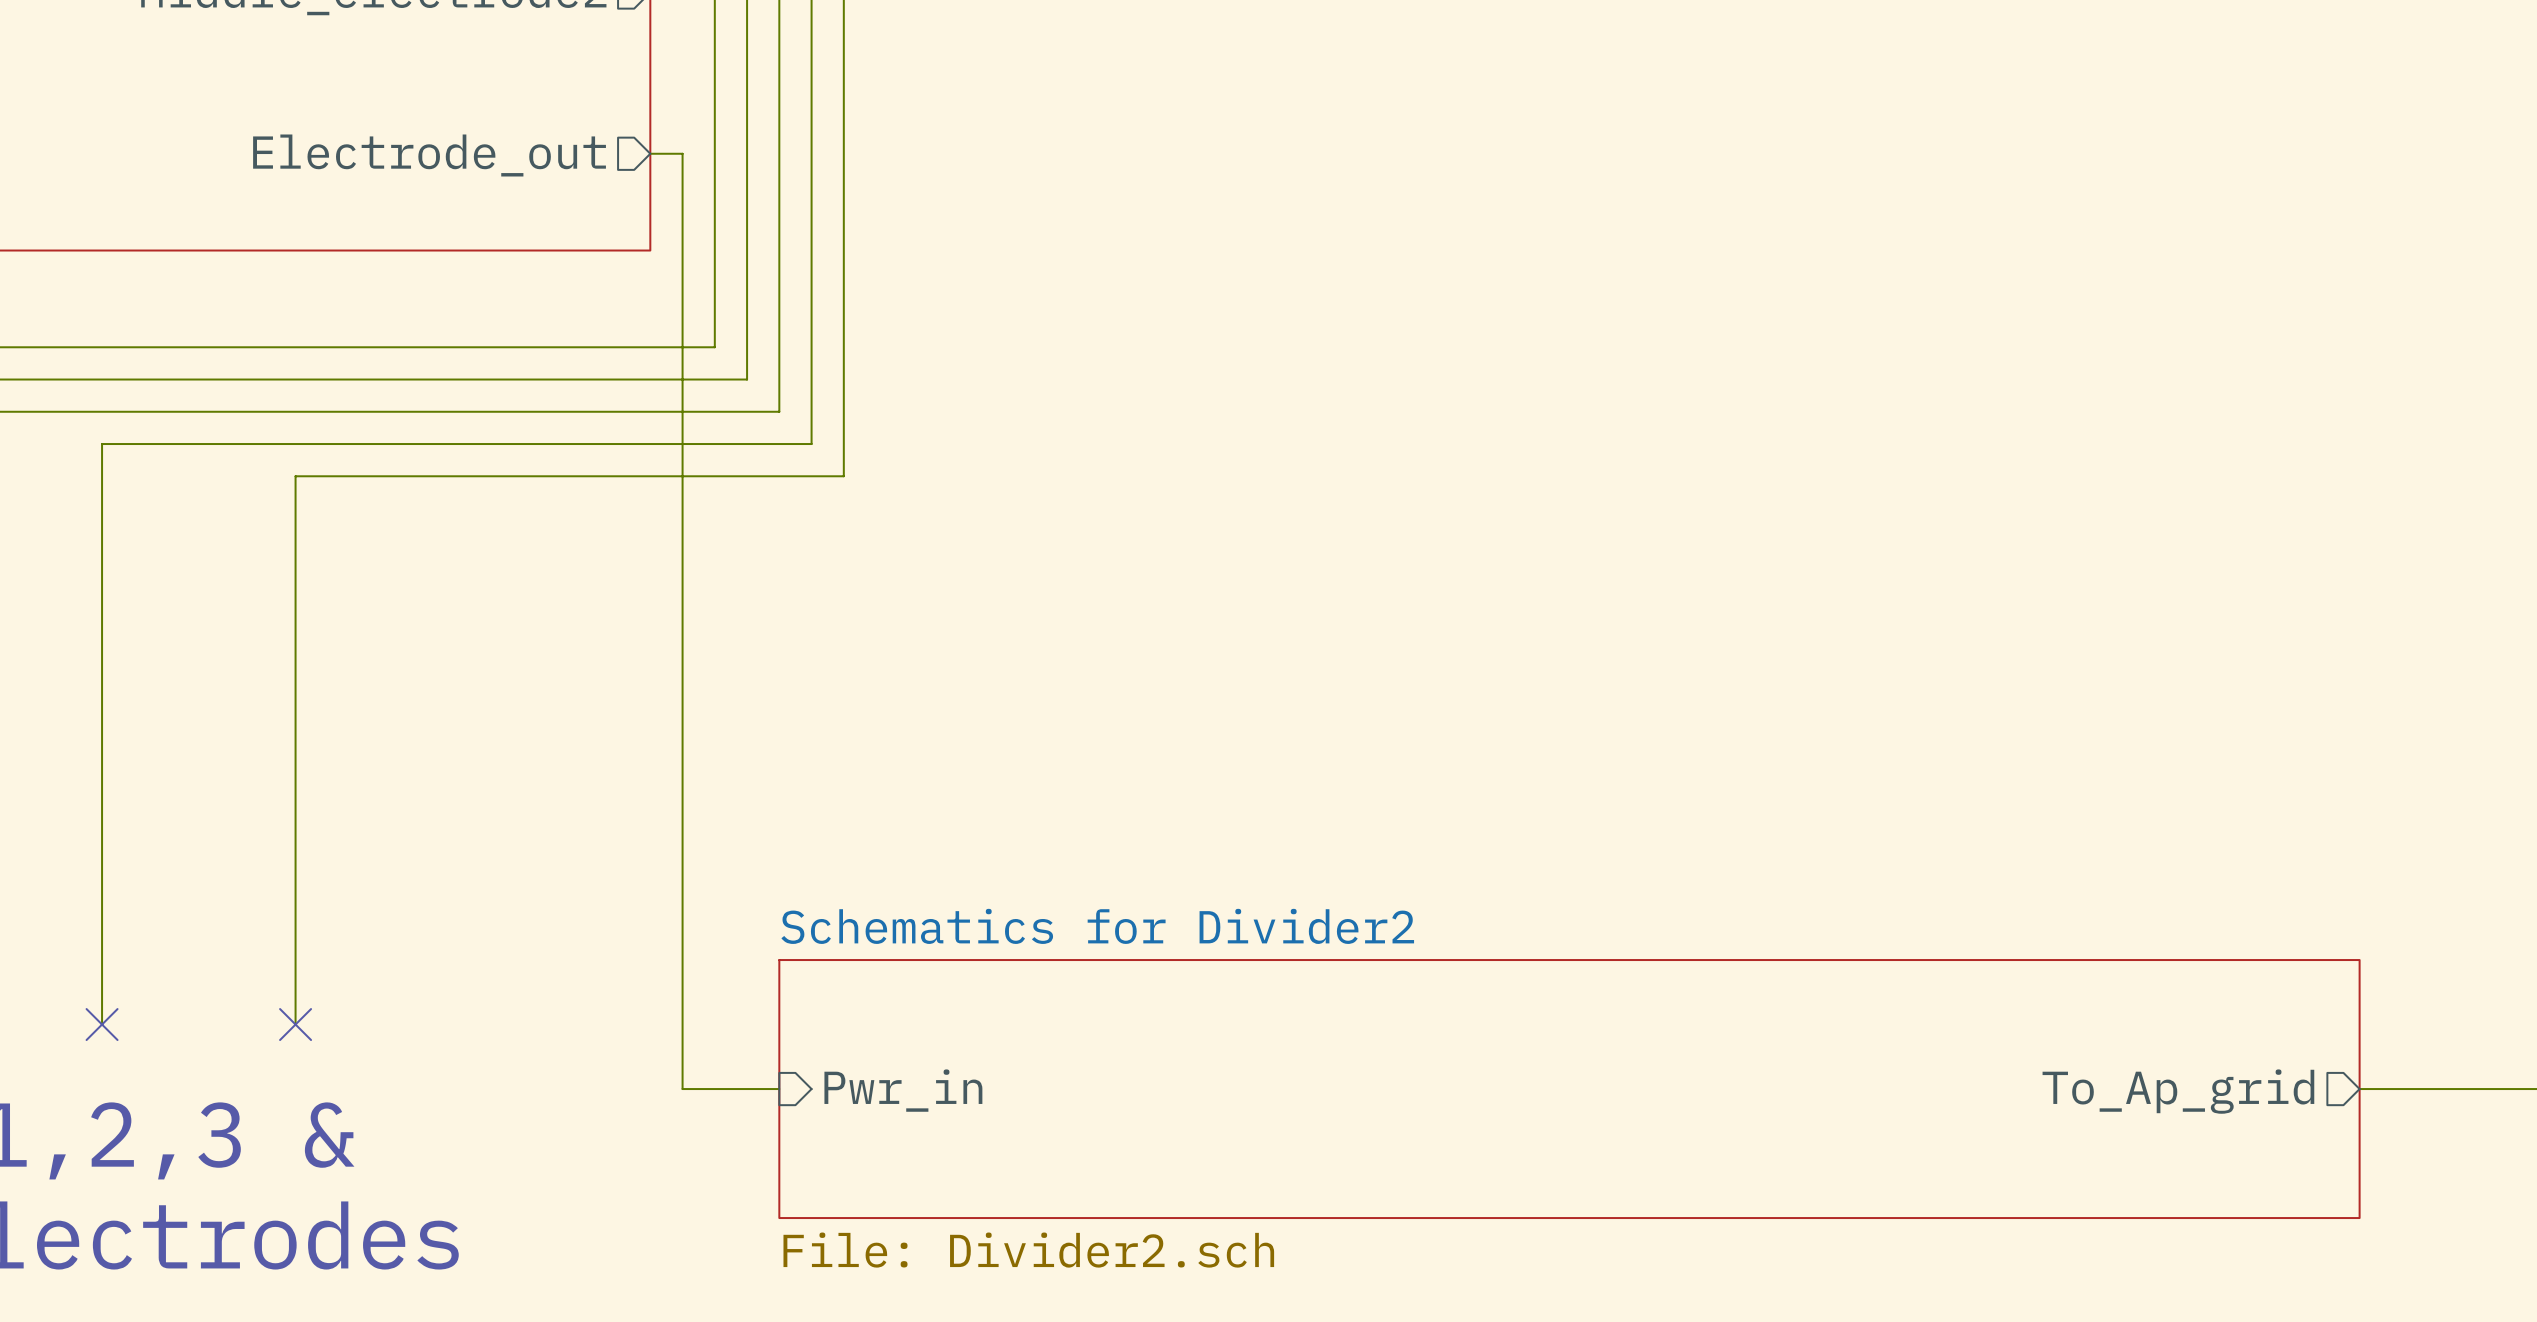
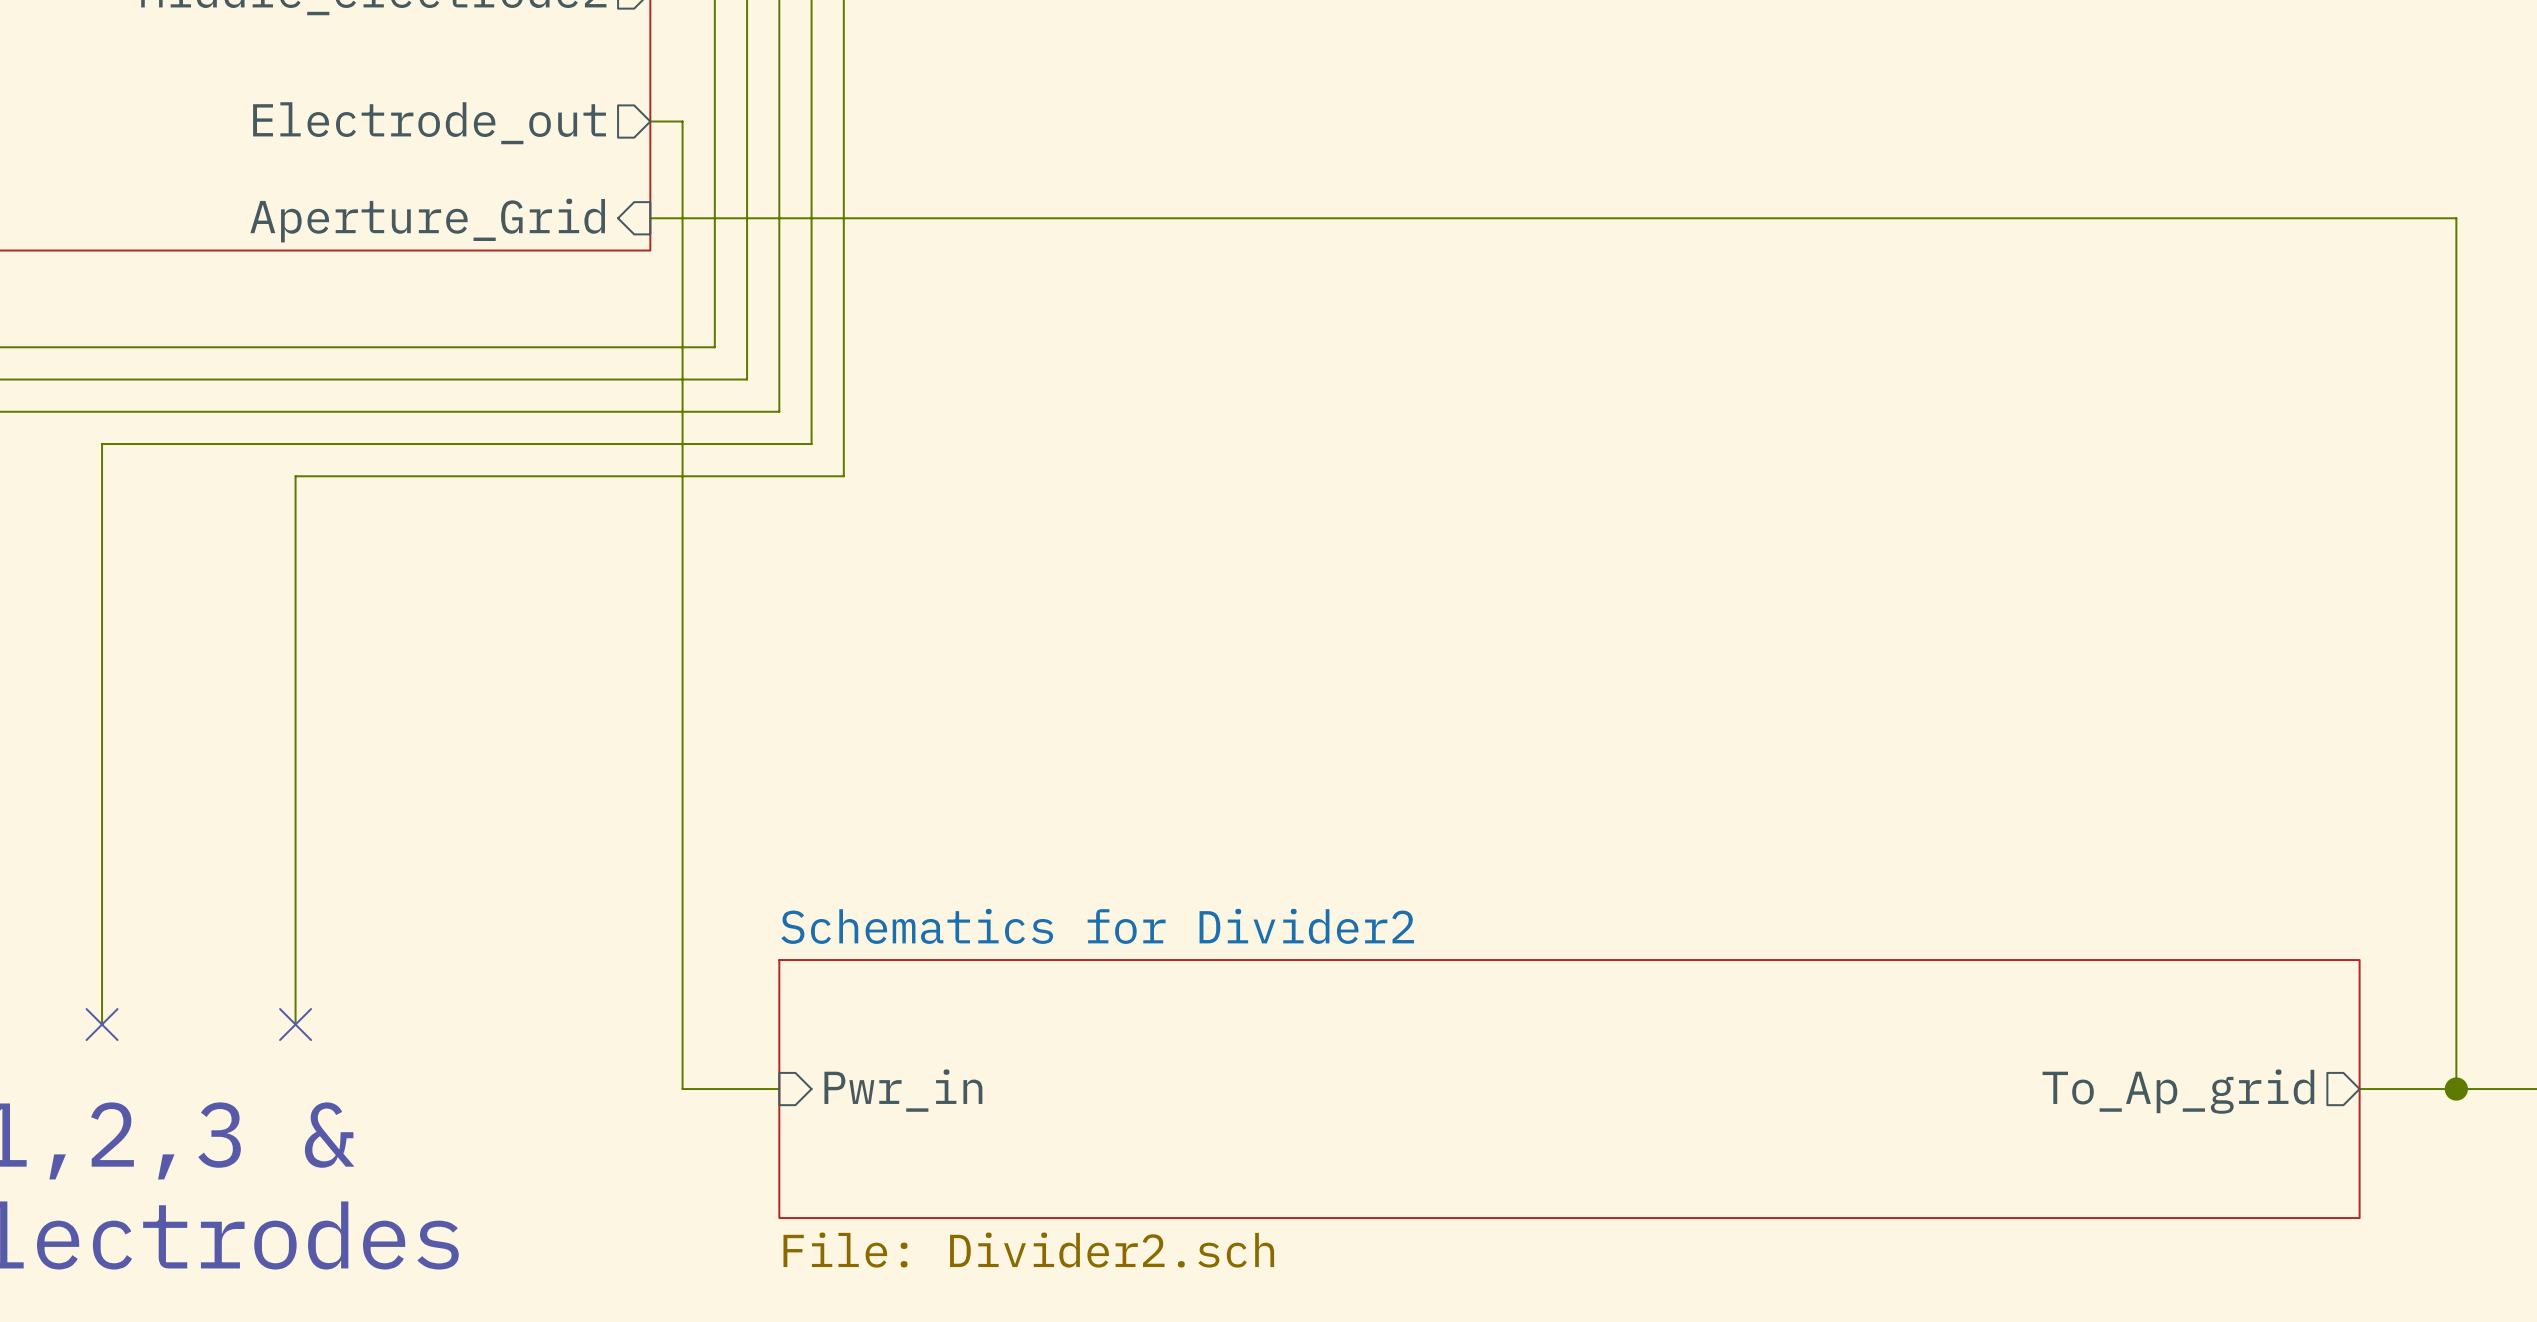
wire: (650, 153) (682, 153) -> (650, 121) (682, 121) (682, 153)
sheet pin position: Electrode_out (429, 155) -> Electrode_out (429, 123)
wire: none -> (650, 218) (2456, 218) (2456, 1089)
sheet pin: none -> Aperture_Grid (427, 220)
junction: none -> (2456, 1089)

